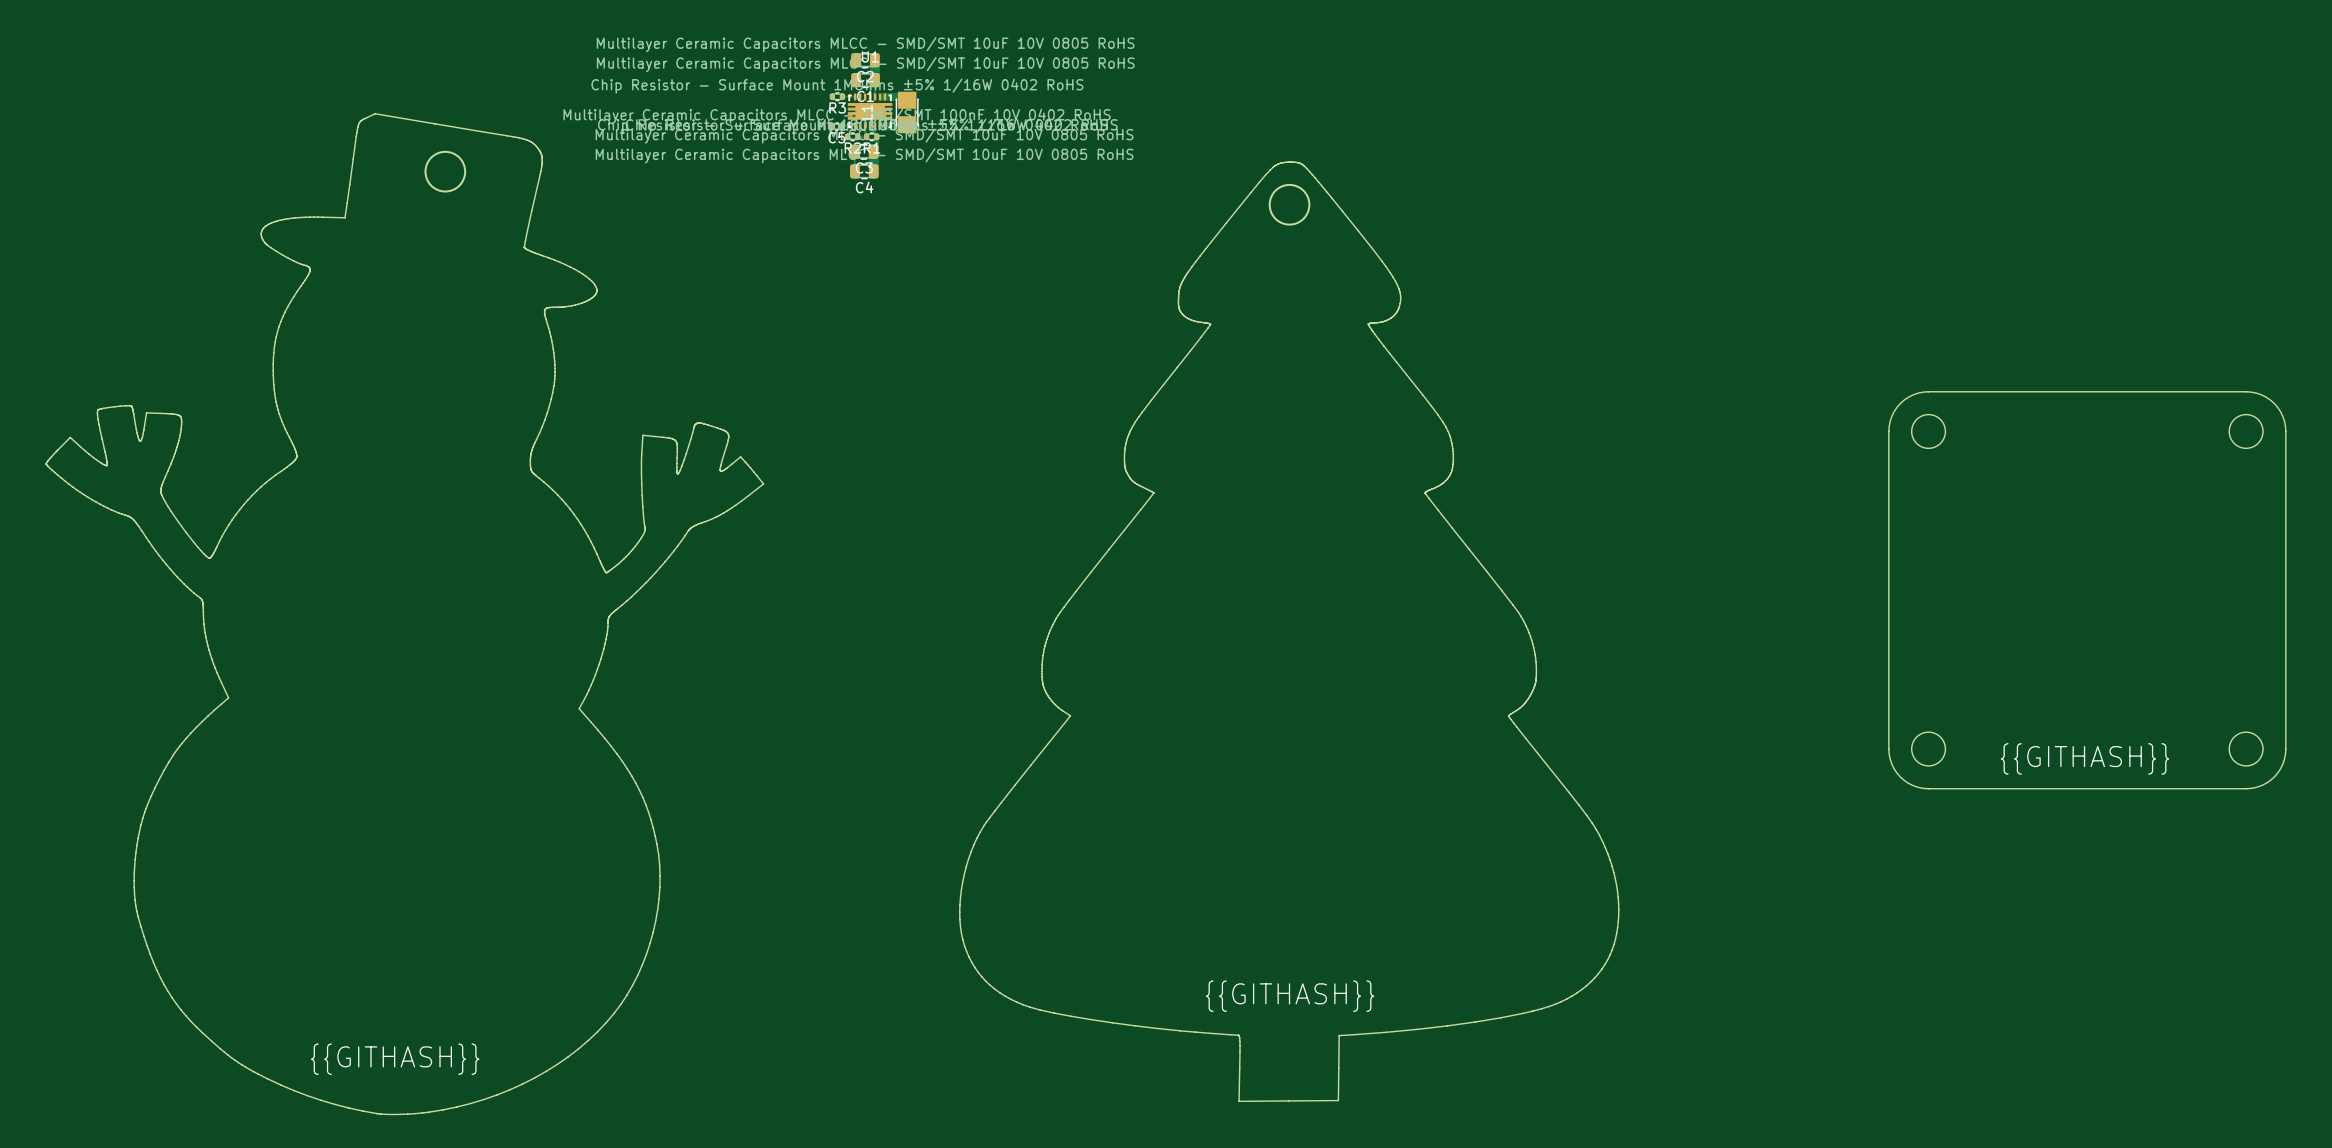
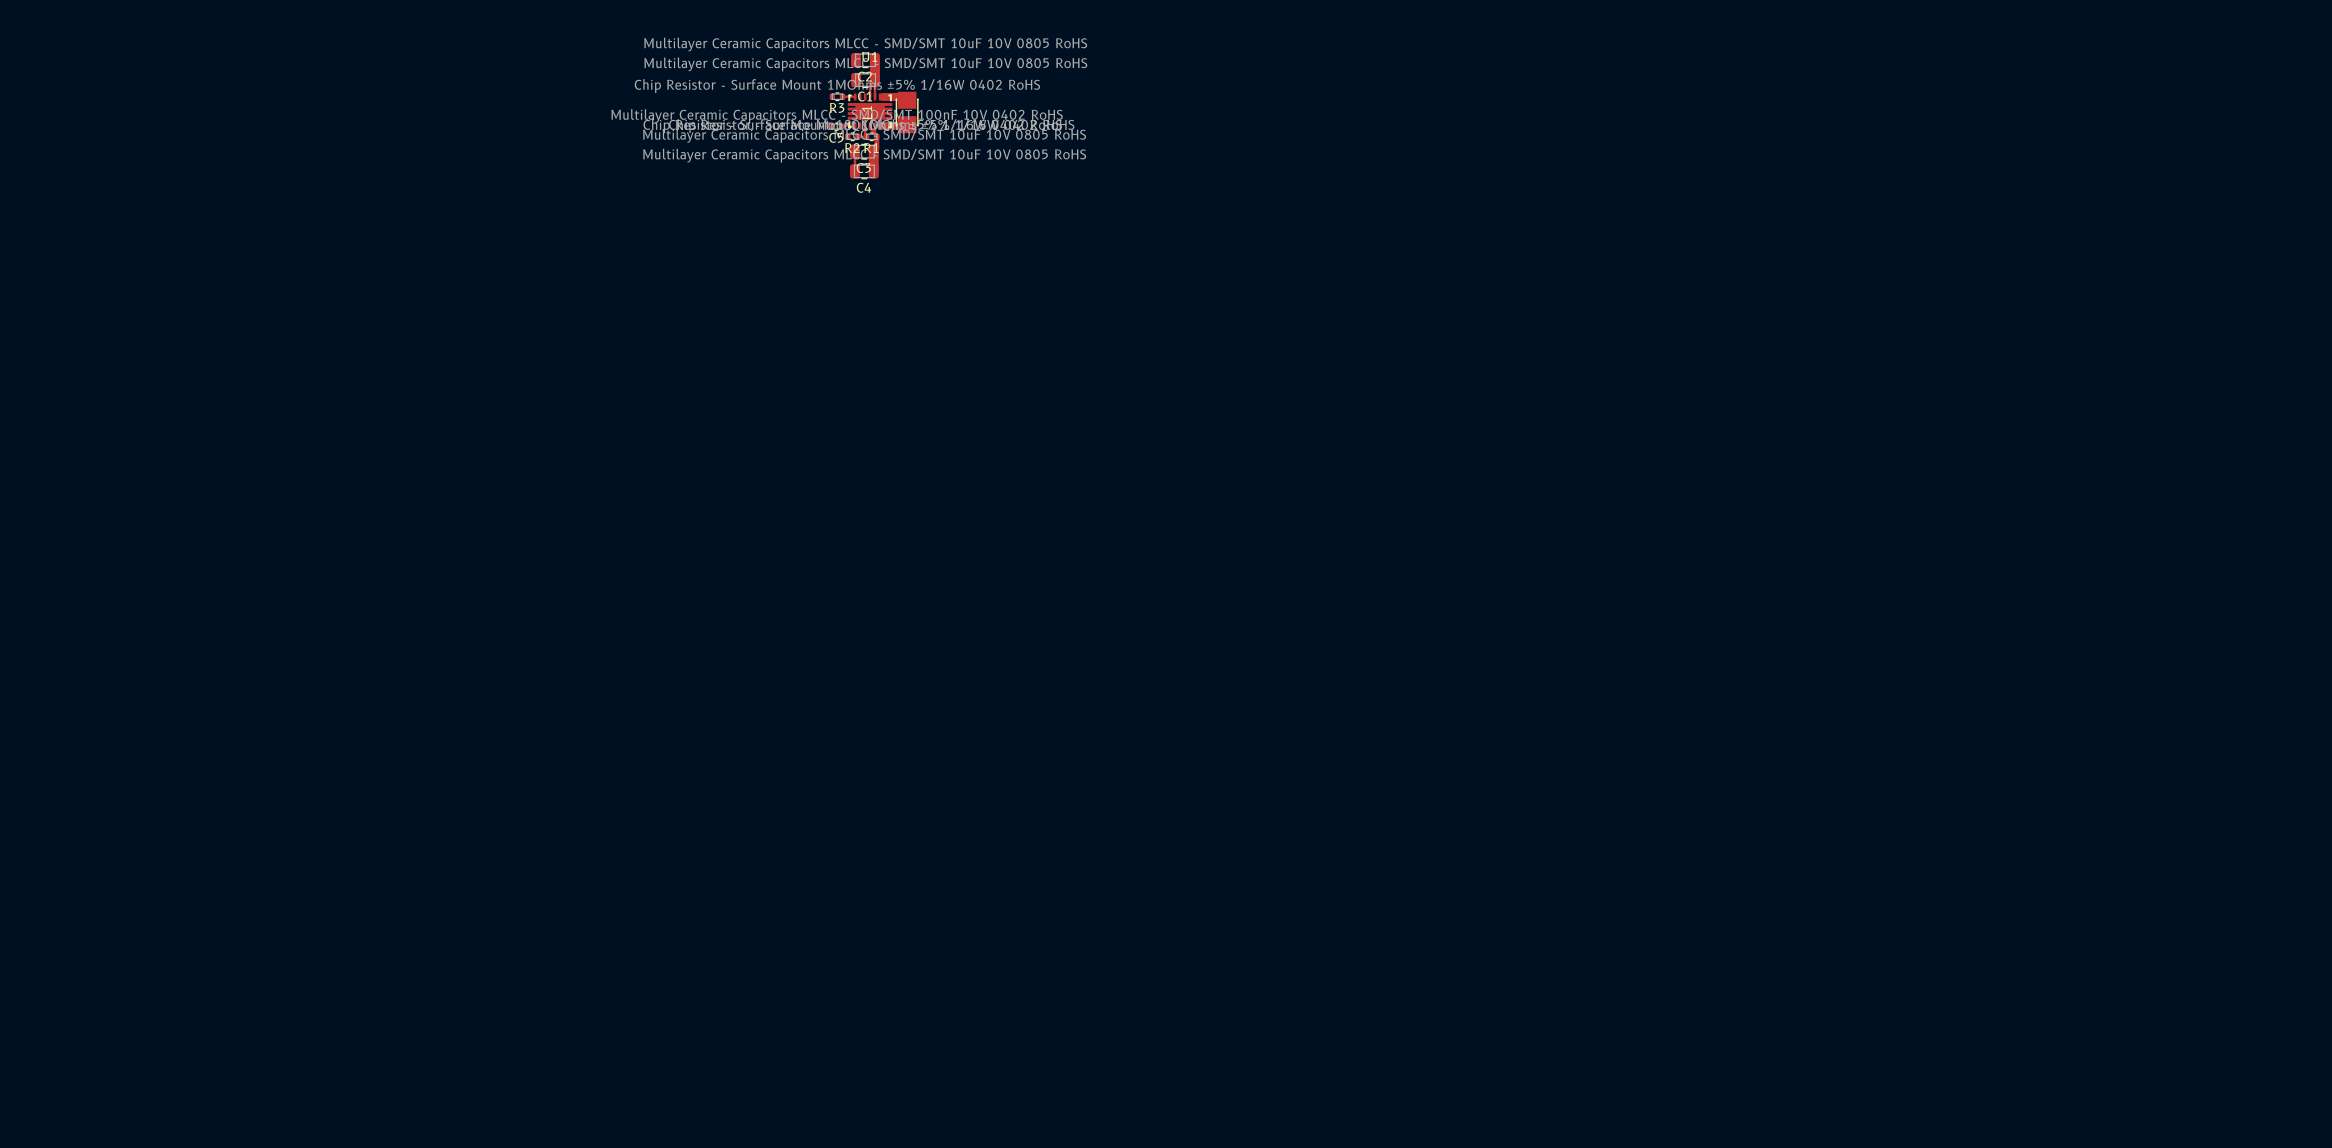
round board edge: [424, 150, 467, 193] -> none
round board edge: [1268, 183, 1311, 226] -> none
board edge: (524, 247) (542, 162) (540, 152) (533, 143) (516, 137) (375, 113) (360, 121) (356, 132) (345, 217) (285, 219) (268, 224) (261, 231) (262, 238) (267, 245) (310, 269) (282, 316) (277, 331) (273, 352) (273, 380) (276, 401) (296, 456) (290, 464) (261, 486) (243, 504) (228, 525) (210, 558) -> none
board edge: (524, 247) (574, 269) (589, 278) (596, 288) (594, 295) (583, 302) (568, 306) (548, 307) (544, 309) (553, 352) (554, 379) (547, 413) (531, 451) (530, 464) (532, 472) (557, 494) (577, 519) (606, 572) -> none
board edge: (1210, 324) (1190, 319) (1180, 312) (1178, 298) (1182, 281) (1200, 256) (1265, 175) (1275, 165) (1289, 162) (1301, 163) (1312, 174) (1371, 247) (1397, 285) (1400, 300) (1396, 313) (1386, 320) (1368, 323) -> none
board edge: (1210, 324) (1138, 417) (1127, 438) (1124, 457) (1126, 472) (1134, 482) (1153, 492) -> none
board edge: (1368, 324) (1438, 415) (1449, 435) (1453, 454) (1451, 472) (1443, 482) (1425, 492) -> none
board edge: (1928, 391) (2246, 391) (2261, 394) (2274, 403) (2282, 416) (2285, 431) (2285, 749) (2282, 764) (2274, 777) (2261, 785) (2246, 788) (1928, 788) (1913, 785) (1900, 777) (1891, 764) (1888, 749) (1889, 426) (1894, 411) (1900, 403) (1913, 394) (1928, 391) -> none
board edge: (131, 405) (97, 410) (107, 465) -> none
board edge: (131, 406) (140, 441) (146, 412) (174, 414) (181, 417) (178, 440) (162, 485) (161, 492) (186, 532) (209, 558) -> none
round board edge: [1911, 414, 1946, 449] -> none
round board edge: [2228, 414, 2264, 449] -> none
board edge: (46, 463) (70, 437) (93, 457) (106, 465) -> none
board edge: (46, 463) (84, 494) (107, 508) (131, 518) (169, 568) (201, 598) (209, 649) (228, 697) (196, 727) (173, 754) (151, 796) (139, 831) (134, 873) (135, 905) (147, 945) (164, 984) (176, 1003) (196, 1027) (227, 1054) (249, 1069) (280, 1084) (320, 1100) (362, 1111) (393, 1114) (429, 1112) (470, 1103) (509, 1089) (546, 1071) (578, 1048) (606, 1022) (626, 995) (642, 965) (653, 932) (659, 898) (659, 865) (653, 827) (642, 797) (627, 768) (579, 708) (599, 664) (610, 615) (655, 572) (690, 528) (726, 511) (763, 483) (740, 456) (720, 471) (728, 434) (722, 429) (700, 423) (694, 425) (677, 473) -> none
board edge: (677, 473) (677, 446) (675, 440) (642, 435) (641, 483) (645, 530) (628, 554) (606, 572) -> none
board edge: (1153, 492) (1069, 600) (1053, 624) (1043, 652) (1042, 683) (1051, 700) (1070, 715) (984, 825) (973, 844) (966, 866) (961, 889) (959, 912) (964, 945) (978, 972) (990, 985) (1005, 996) (1029, 1007) (1071, 1016) (1157, 1028) (1238, 1035) (1239, 1101) (1338, 1100) (1339, 1035) (1417, 1029) (1475, 1021) (1532, 1011) (1566, 998) (1582, 989) (1594, 977) (1604, 964) (1612, 949) (1618, 915) (1615, 878) (1605, 847) (1592, 823) (1508, 716) -> none
board edge: (1425, 493) (1512, 604) (1529, 632) (1535, 658) (1535, 683) (1525, 703) (1508, 715) -> none
round board edge: [1911, 731, 1946, 767] -> none
round board edge: [2228, 731, 2264, 767] -> none
text: {{GITHASH}} (2085, 758) -> none
text: {{GITHASH}} (1289, 996) -> none
text: {{GITHASH}} (395, 1059) -> none

